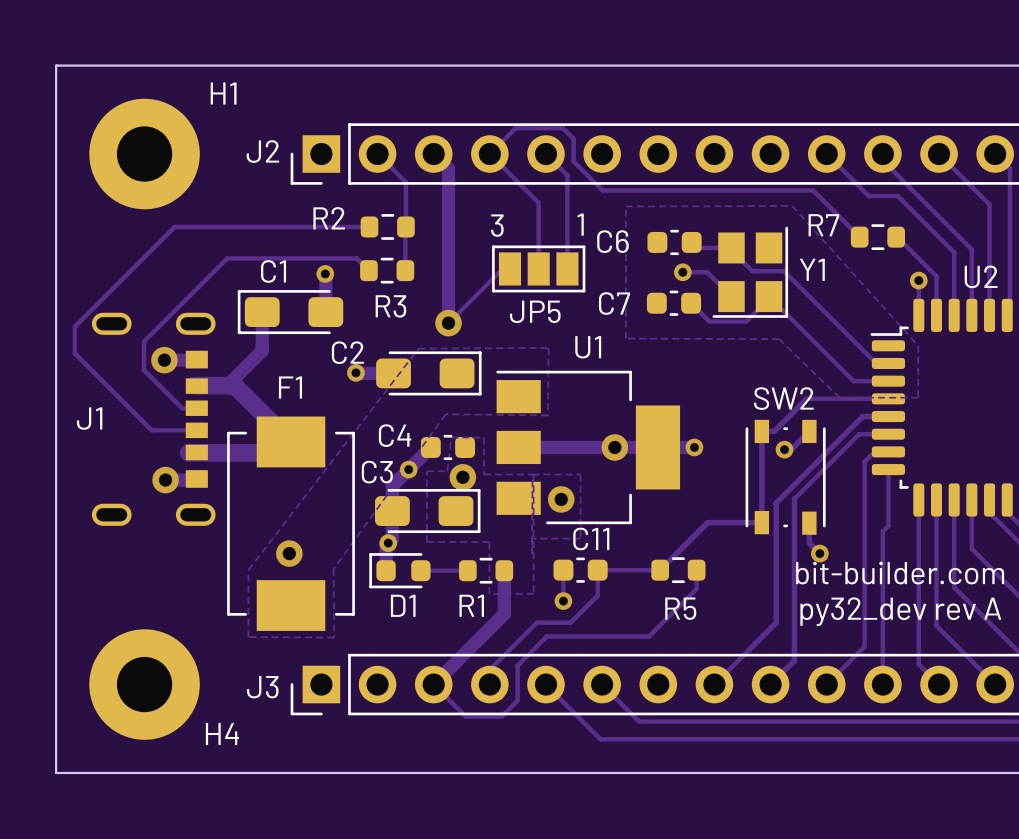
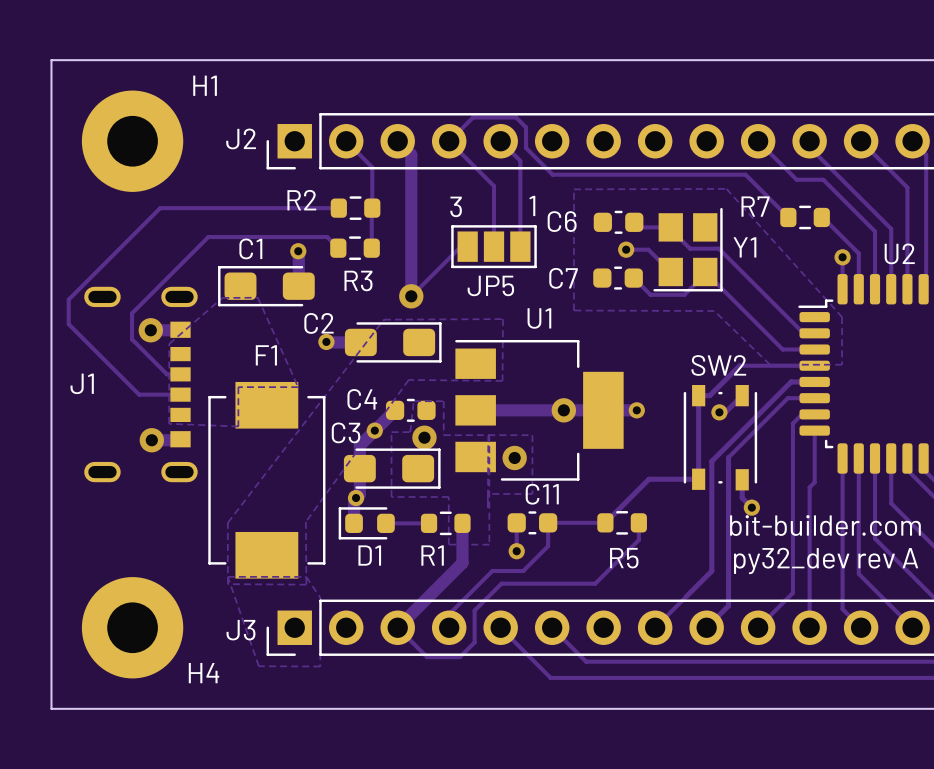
track: (262, 312) (262, 350) (227, 385) -> none
zone outline: none -> (257, 297) (222, 297) (169, 343) (169, 423) (238, 426) (238, 387) (298, 387) (257, 297)
track: (194, 385) (234, 385) (291, 441) (280, 452) (188, 452) -> none
via: (289, 553) -> none
zone outline: none -> (227, 576) (258, 666) (320, 666) (320, 597) (306, 576) (227, 576)

